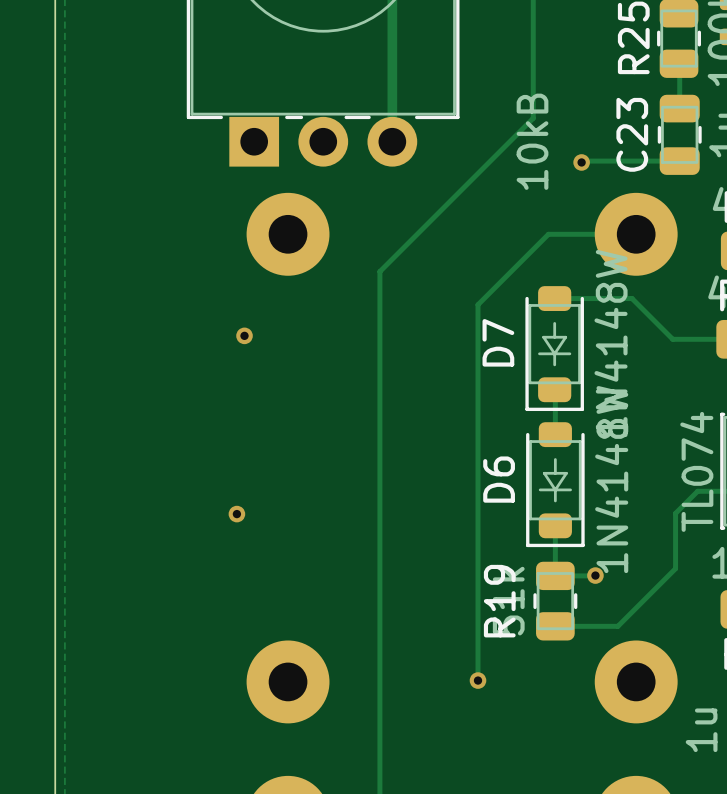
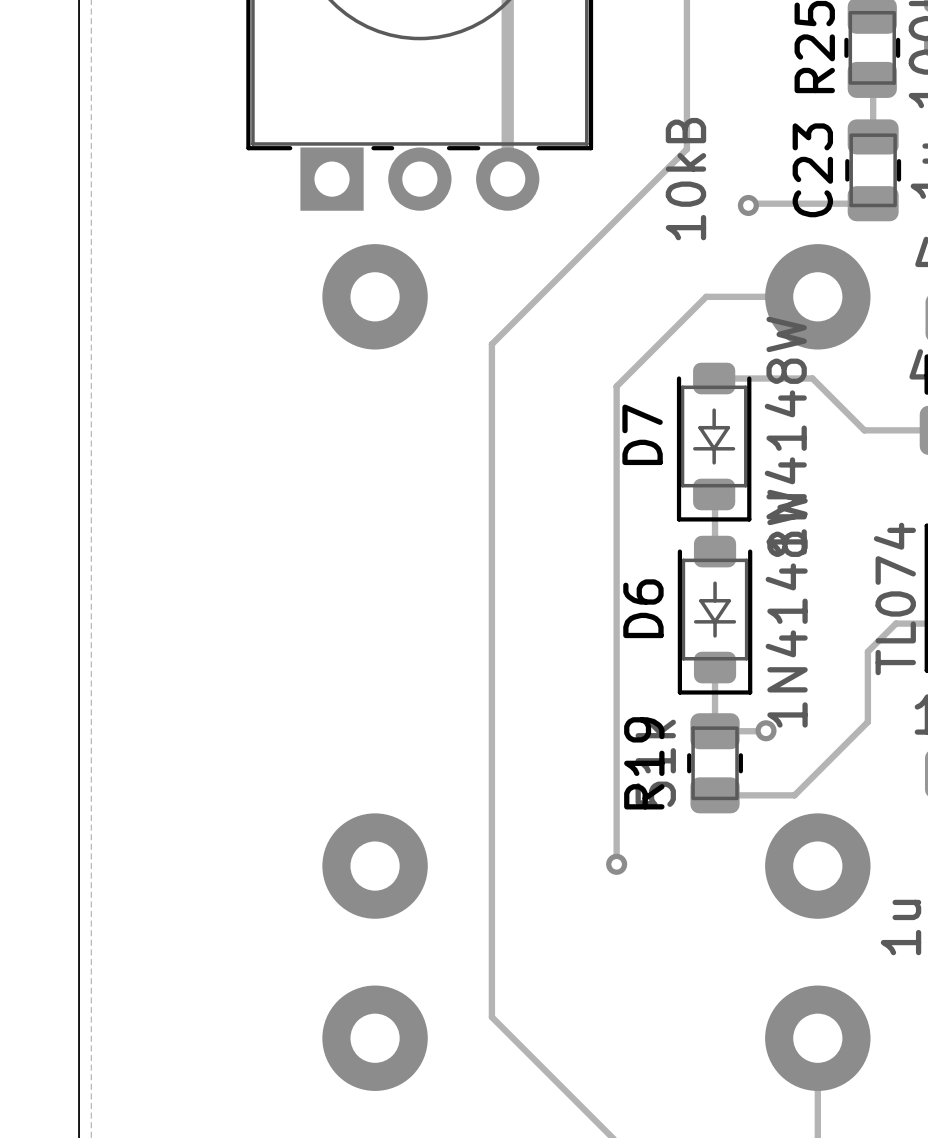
via: (244, 335) -> none
via: (236, 514) -> none

